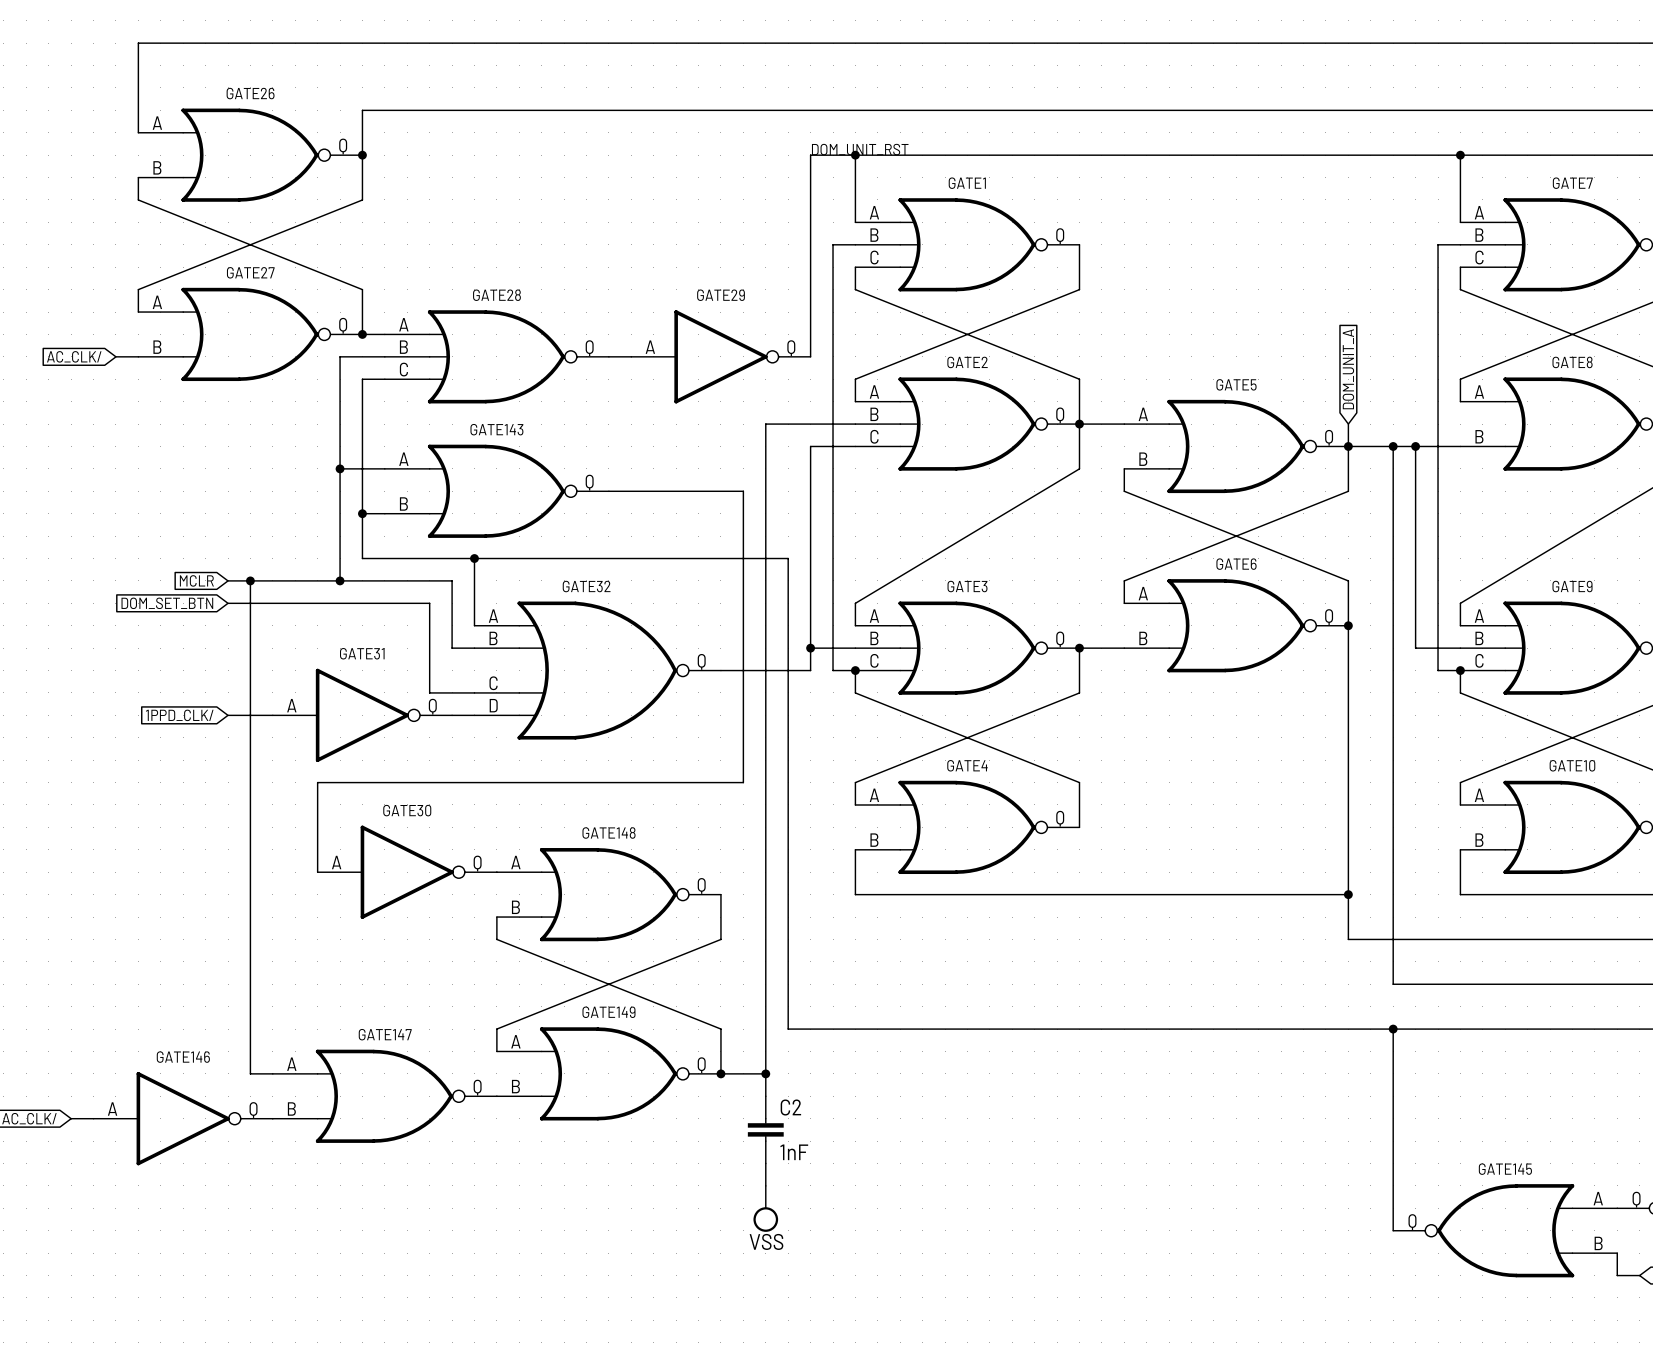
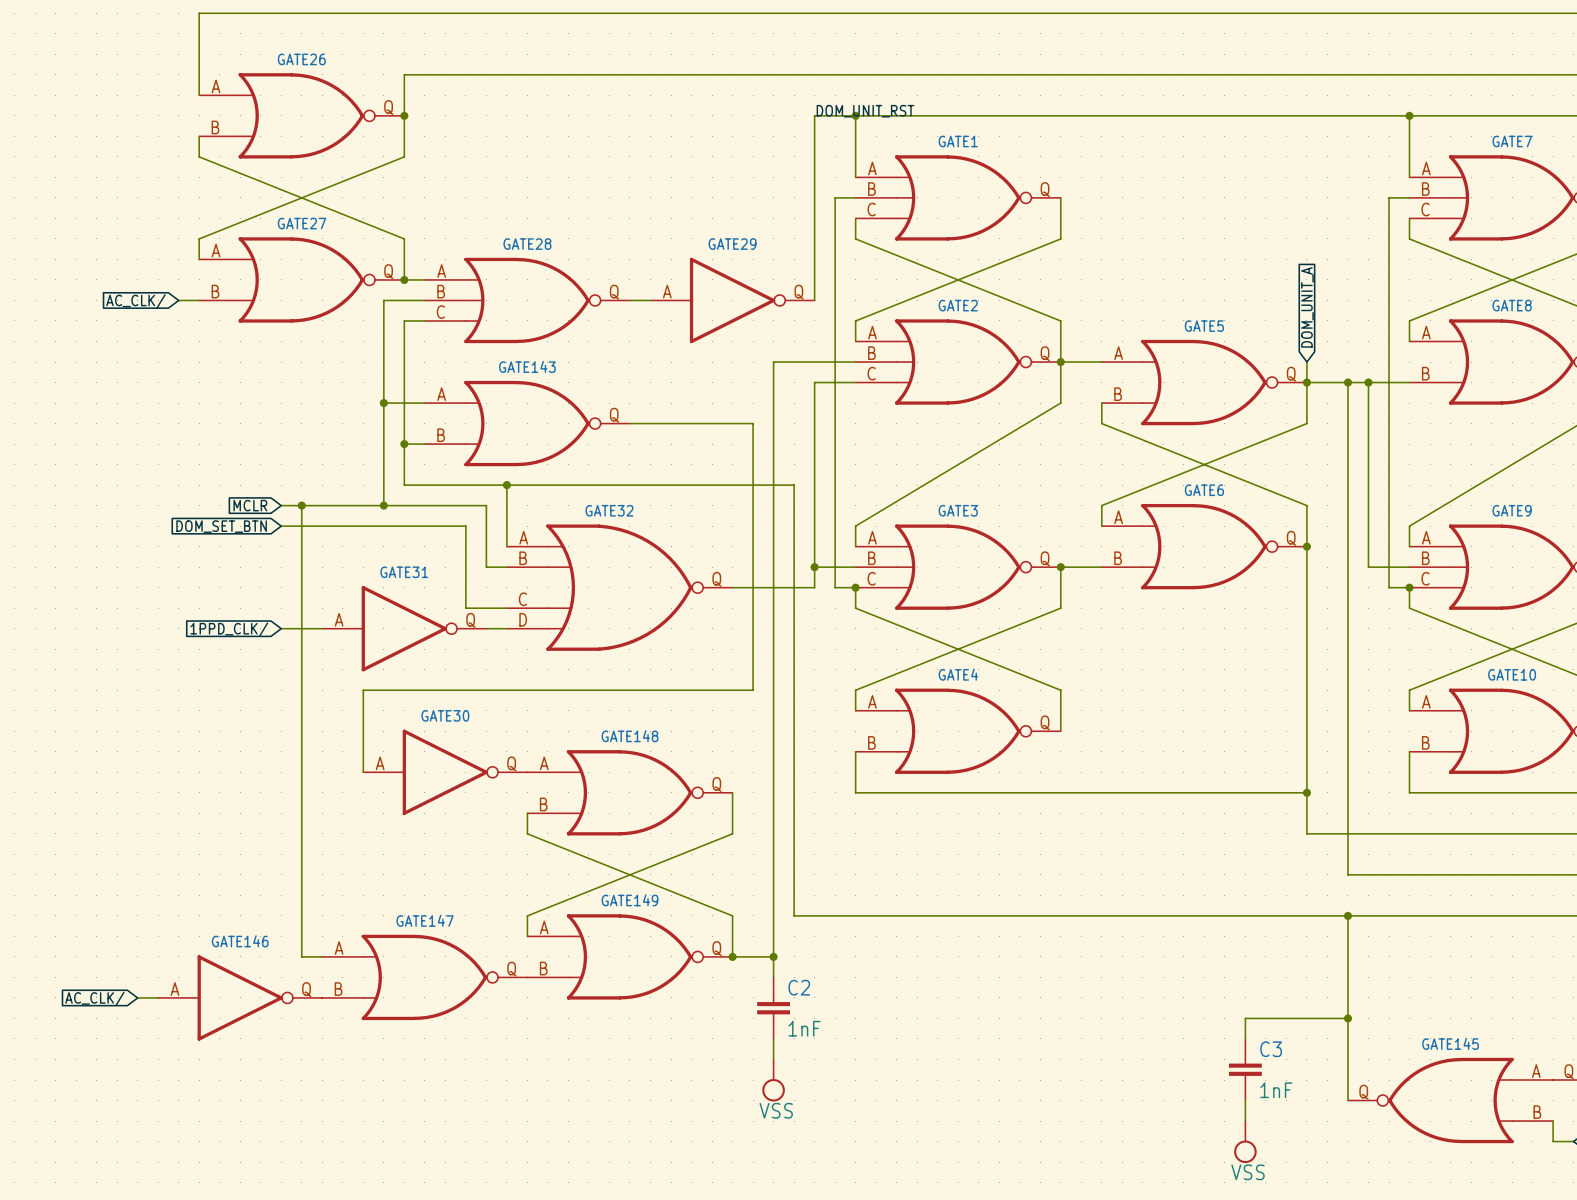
wire: none -> (1347, 1018) (1245, 1018) (1245, 1038)
junction: none -> (1347, 1018)
C3: none -> 1nF (1245, 1069)
wire: none -> (1245, 1100) (1245, 1121)
power symbol: none -> VSS (1245, 1142)

